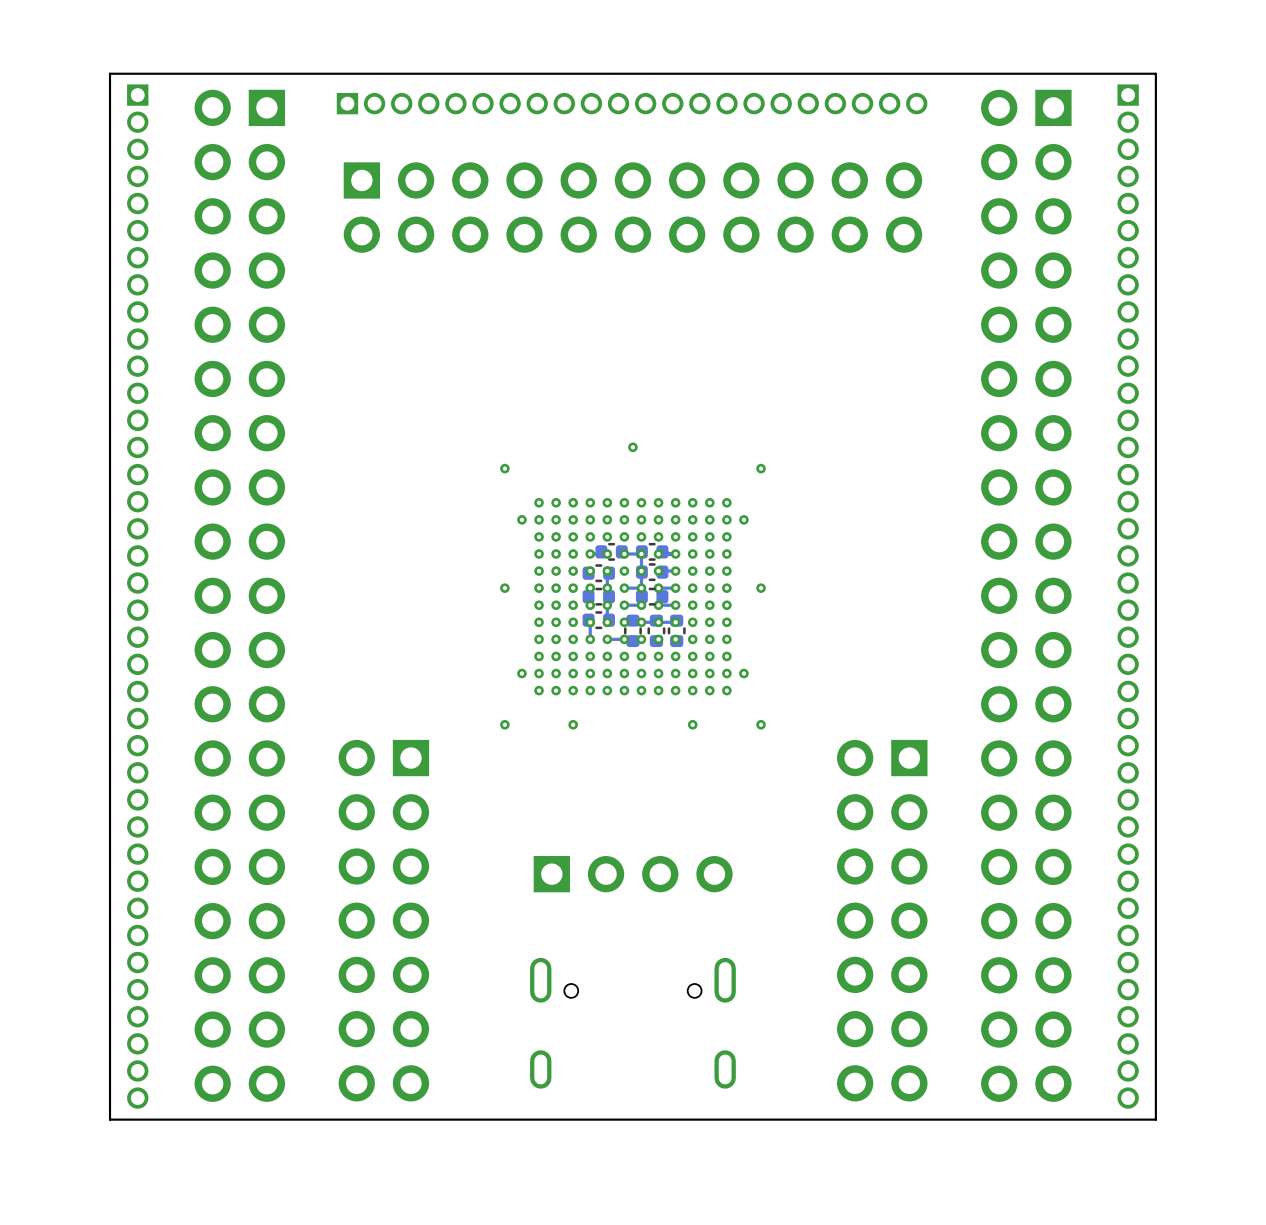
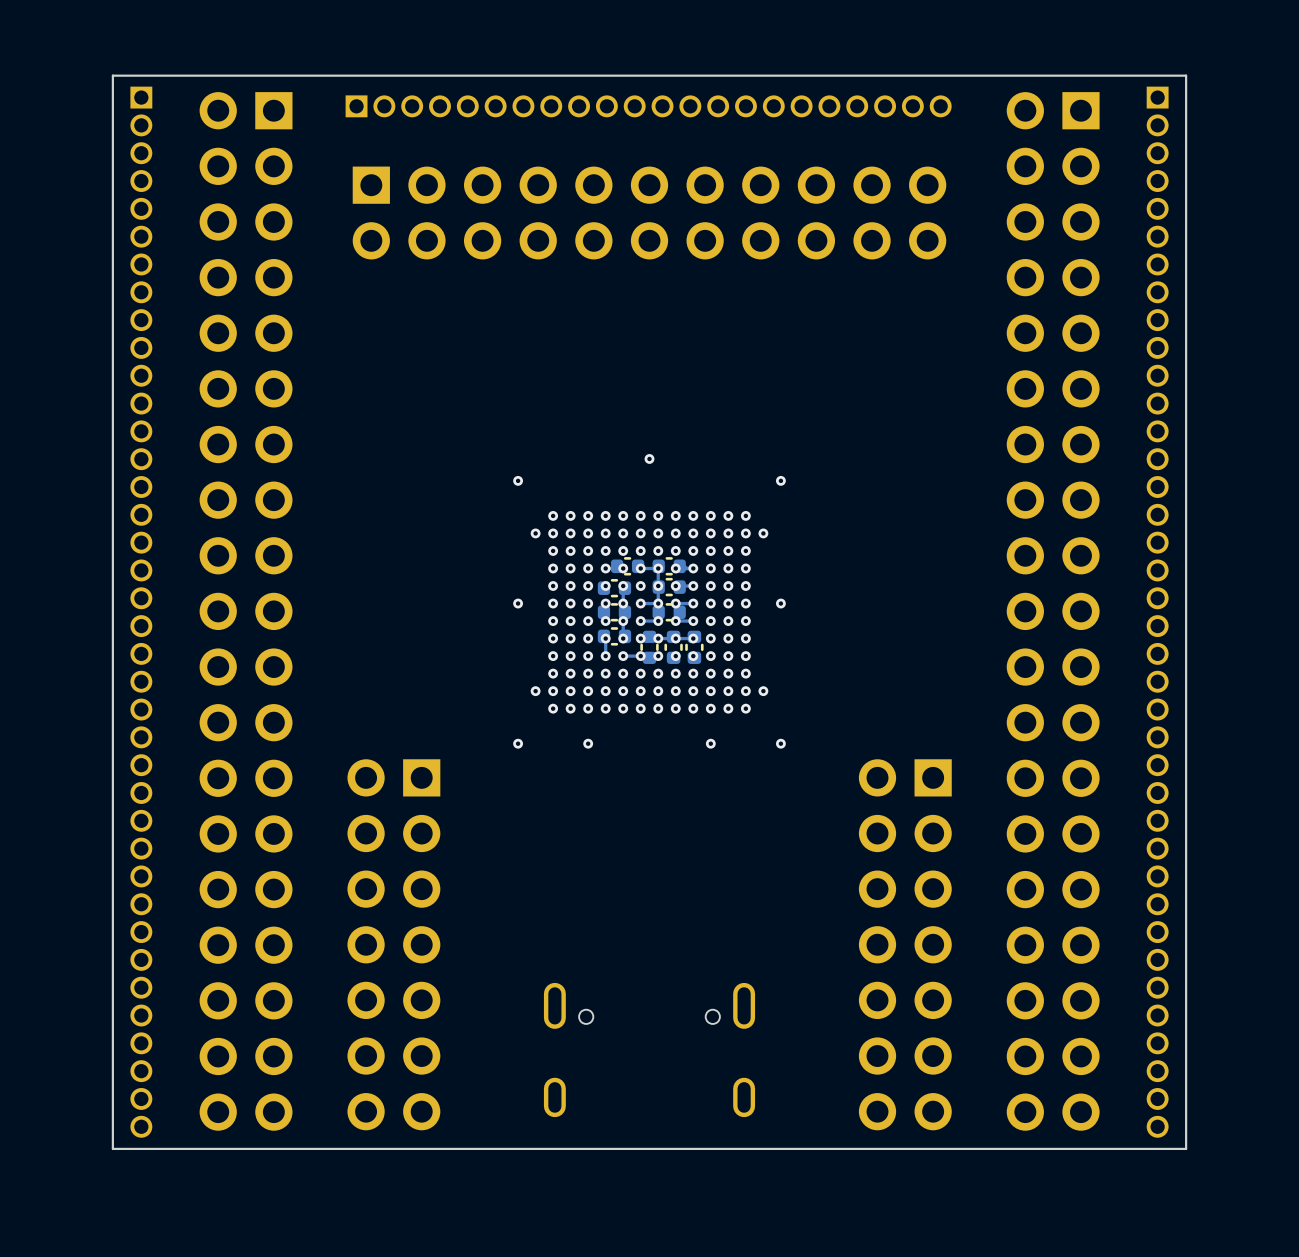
part: (633, 874) -> none

